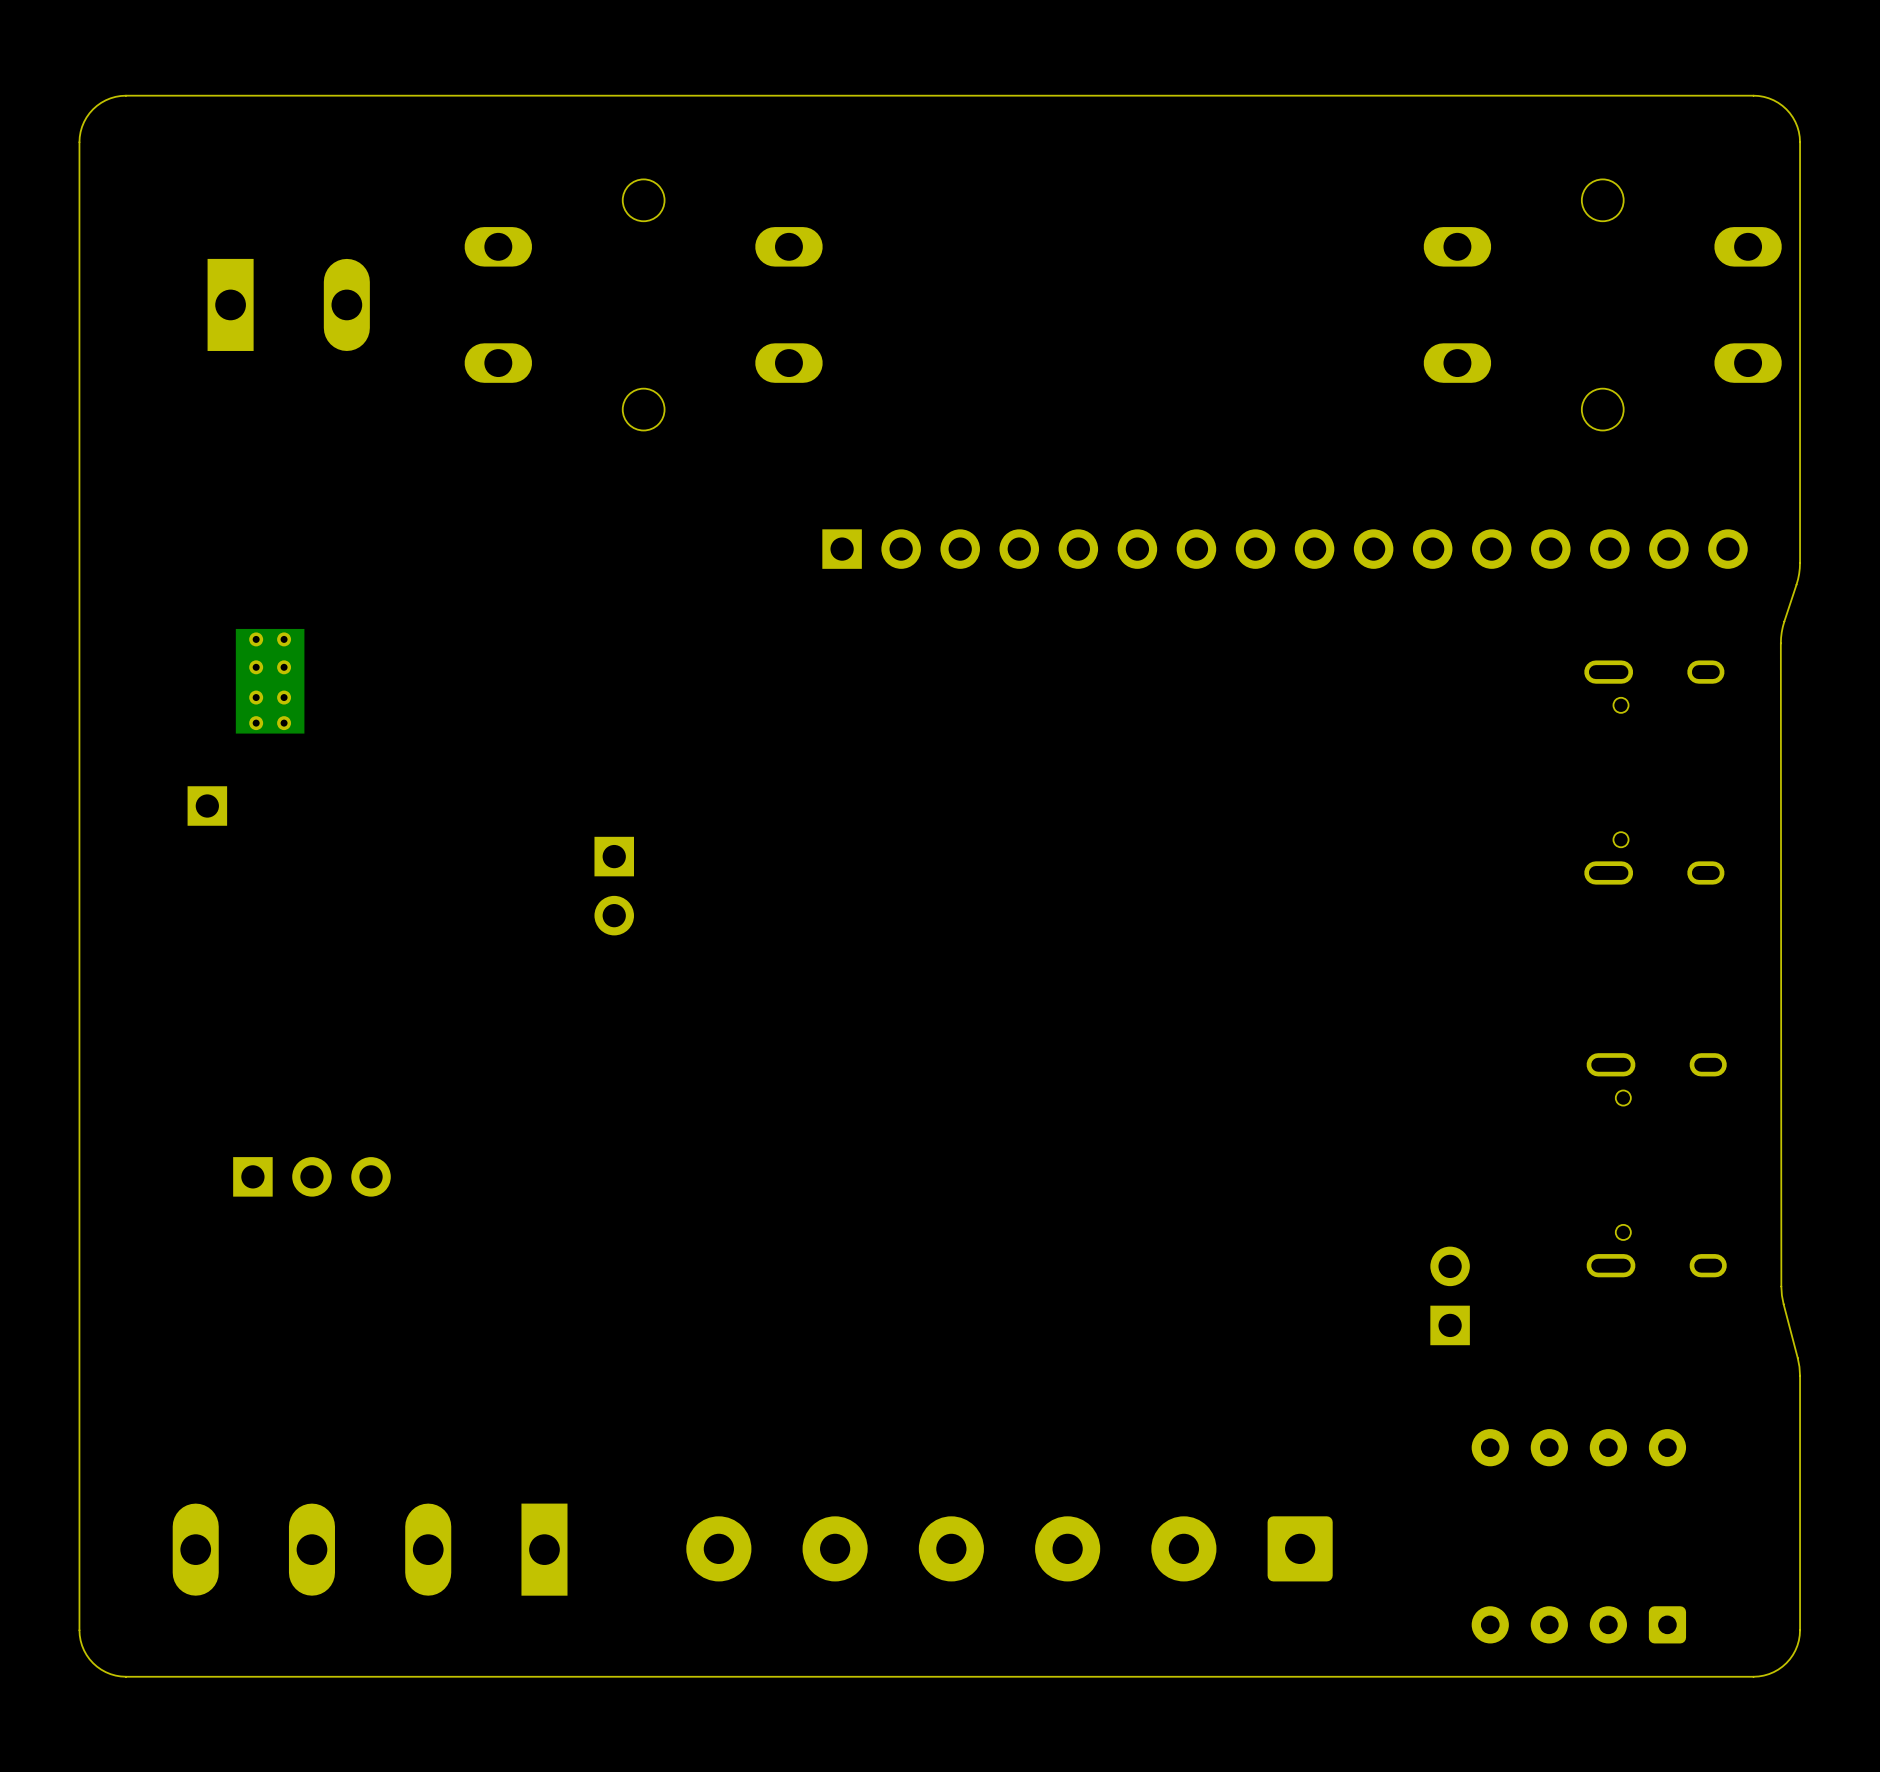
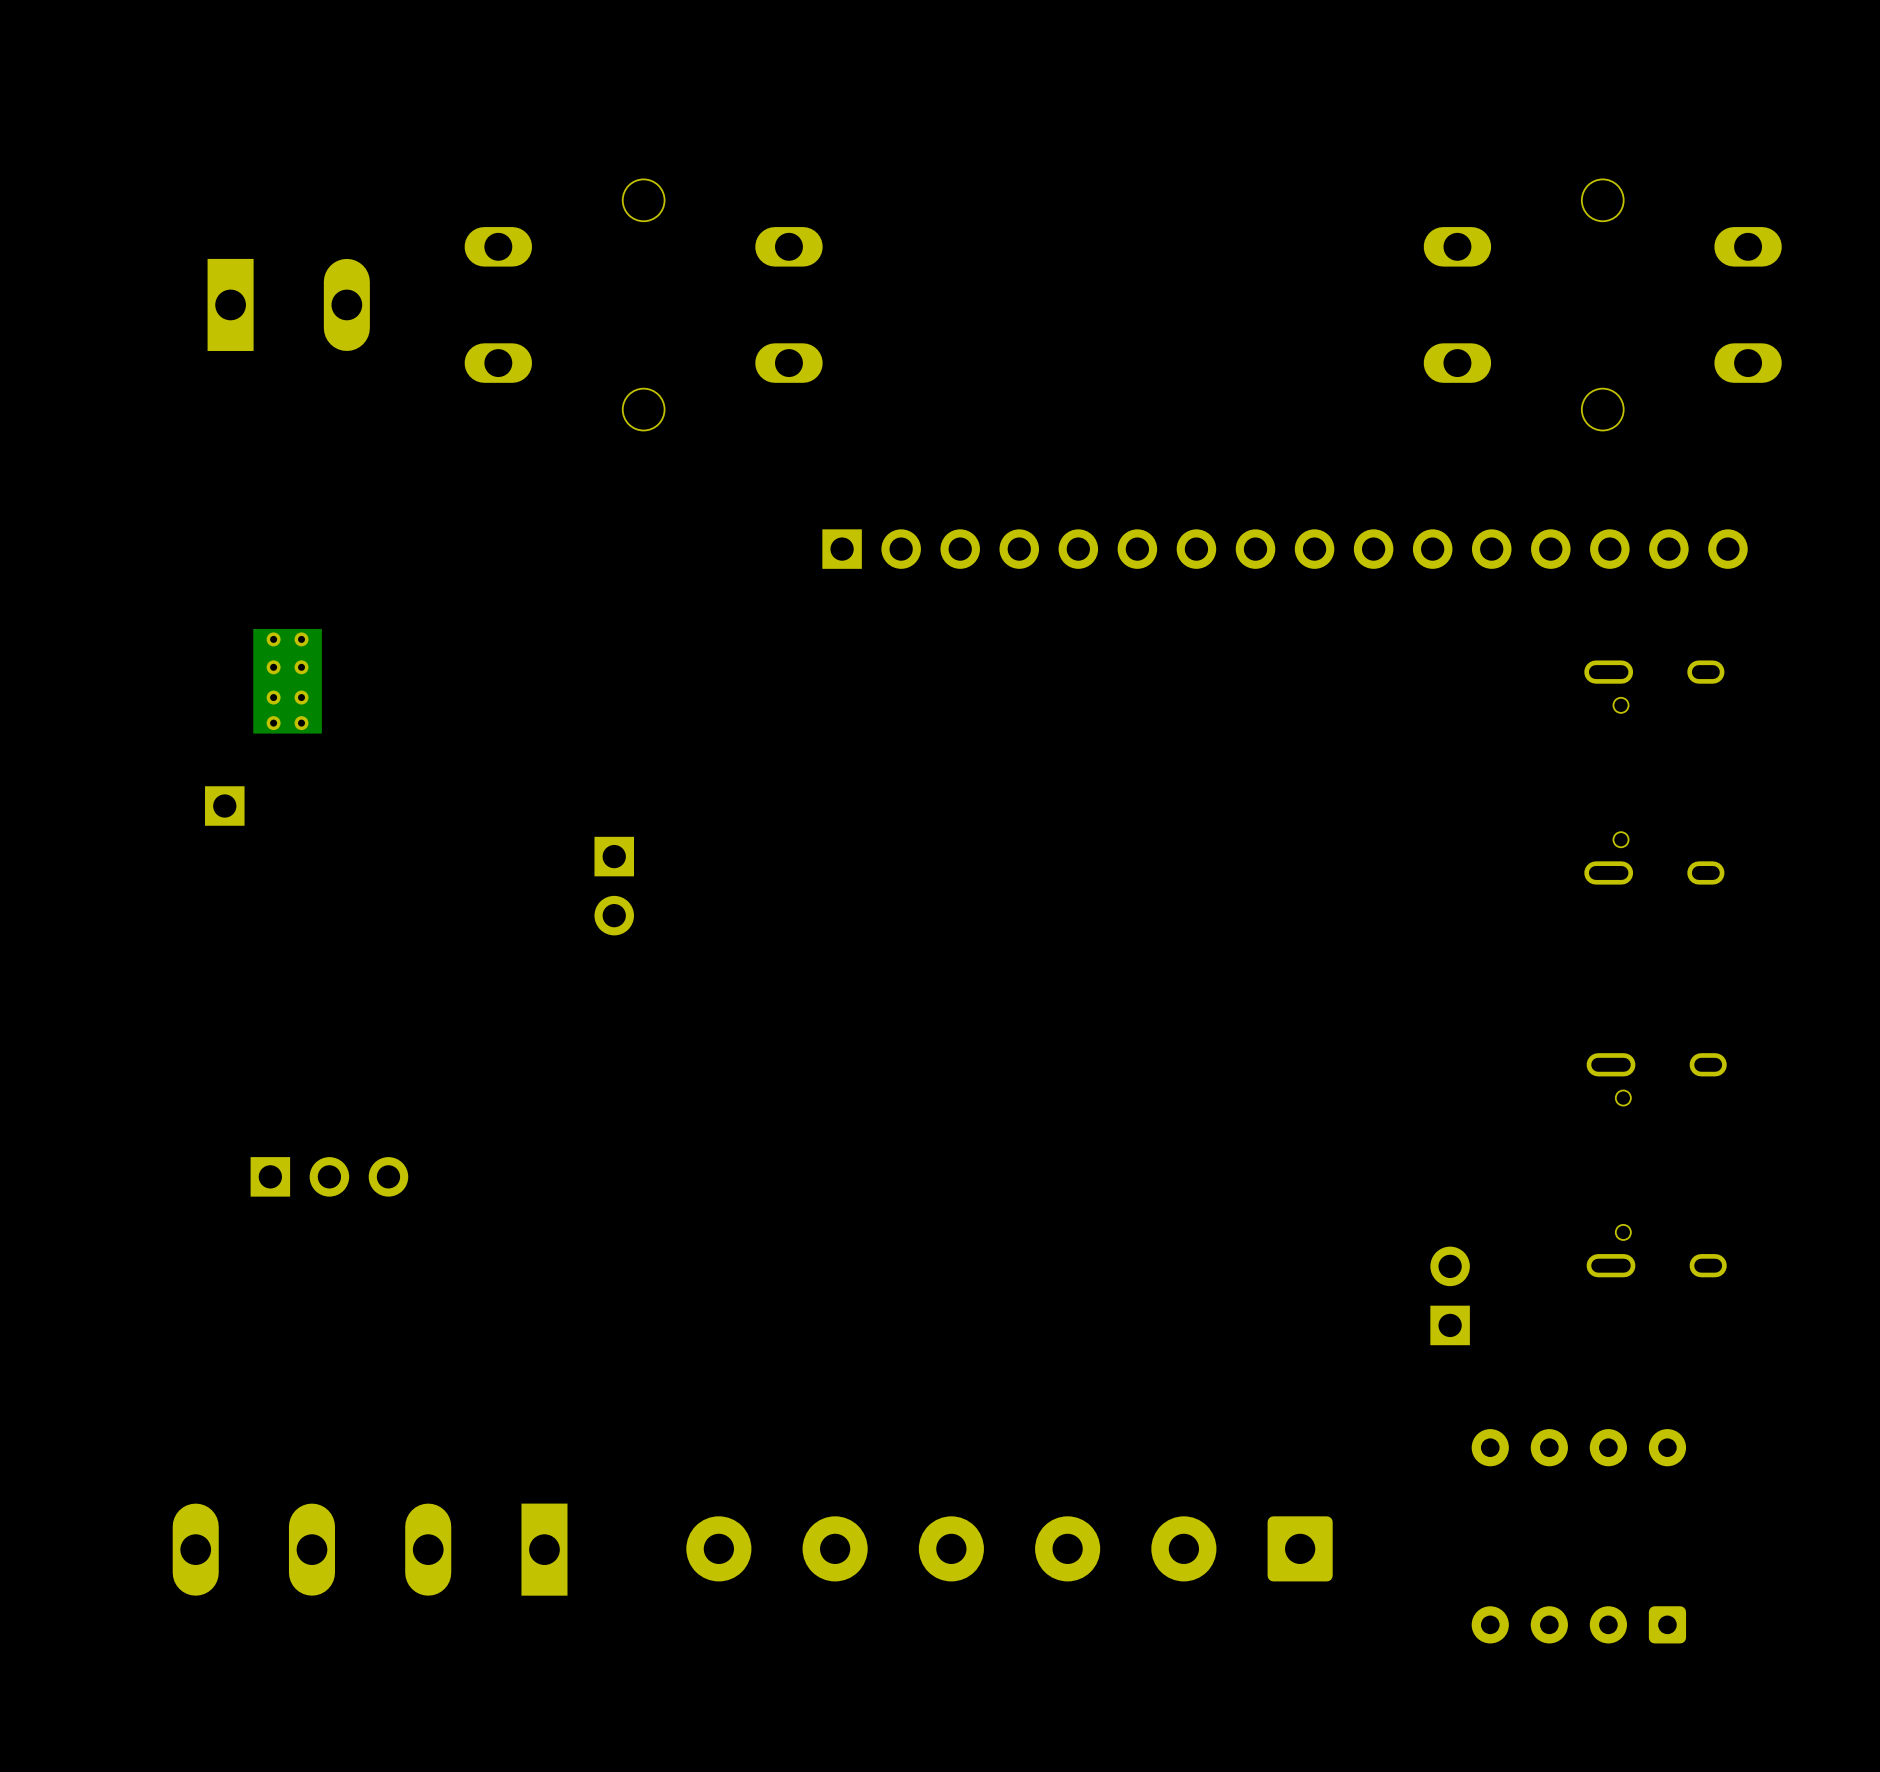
board edge: (1753, 95) (125, 95) (110, 98) (93, 109) (84, 122) (79, 142) (79, 1630) (82, 1645) (93, 1663) (110, 1674) (125, 1676) (1753, 1676) (1768, 1674) (1786, 1663) (1795, 1650) (1800, 1630) (1800, 1375) (1781, 1286) (1780, 643) (1782, 626) (1798, 579) (1800, 562) (1800, 142) (1795, 122) (1786, 109) (1768, 98) (1753, 95) -> none
part position: (270, 681) -> (287, 681)
part position: (207, 806) -> (224, 806)
part position: (311, 1176) -> (329, 1176)

